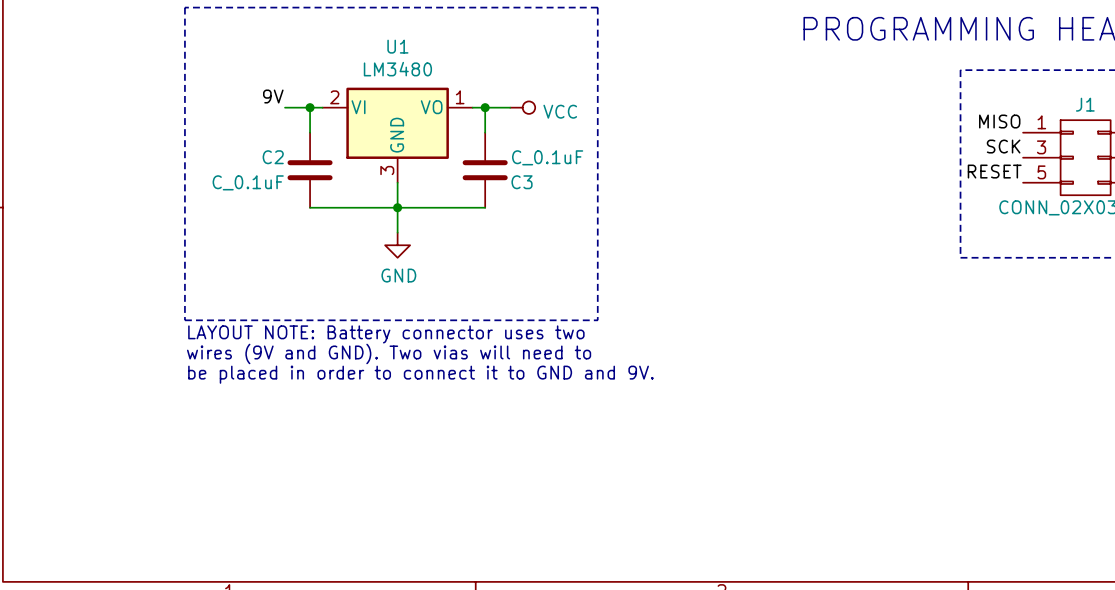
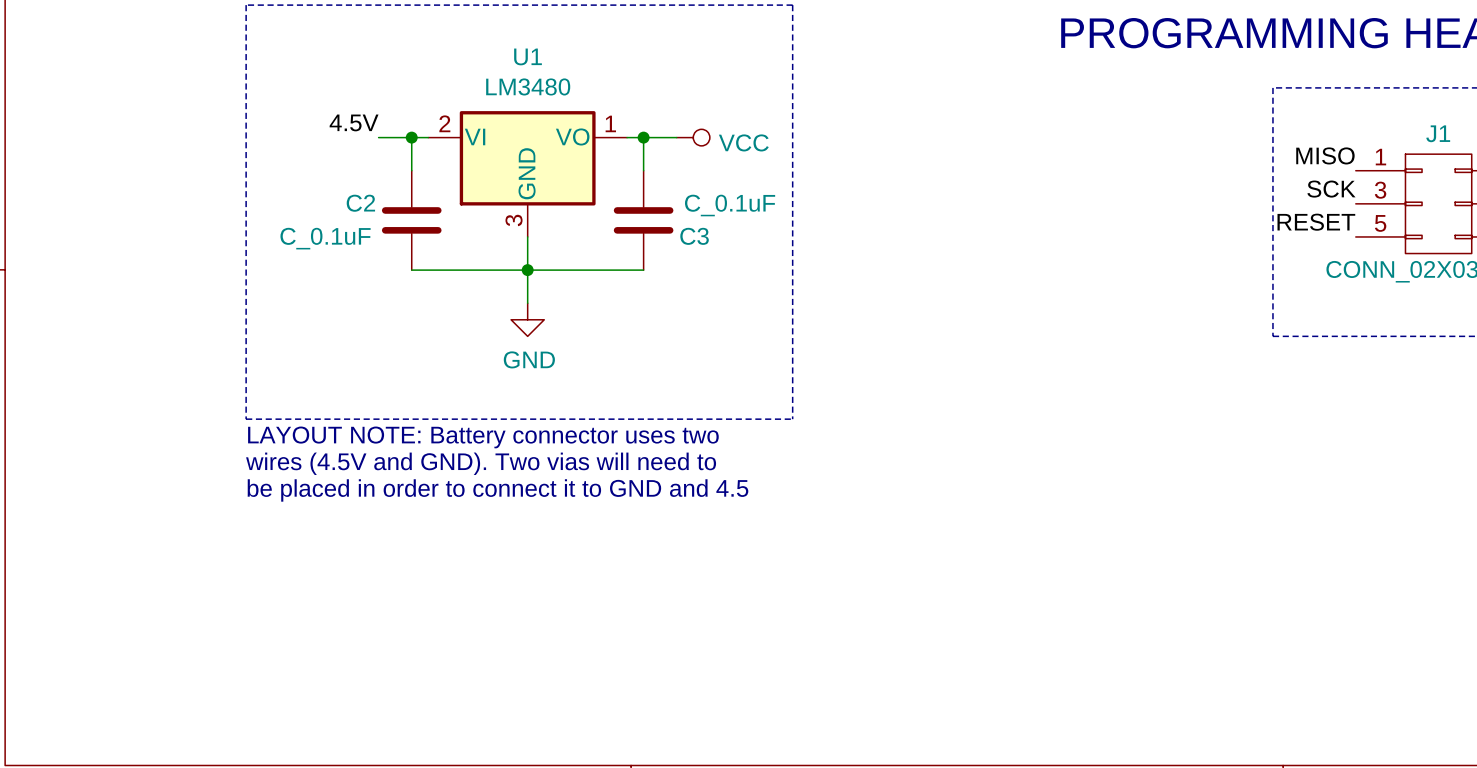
label: 9V (273, 96) -> 4.5V (354, 122)
text: wires (9V and GND). Two vias will need to (389, 353) -> wires (4.5V and GND). Two vias will need to (481, 463)
text: be placed in order to connect it to GND and 9V. (420, 374) -> be placed in order to connect it to GND and 4.5 (497, 490)

